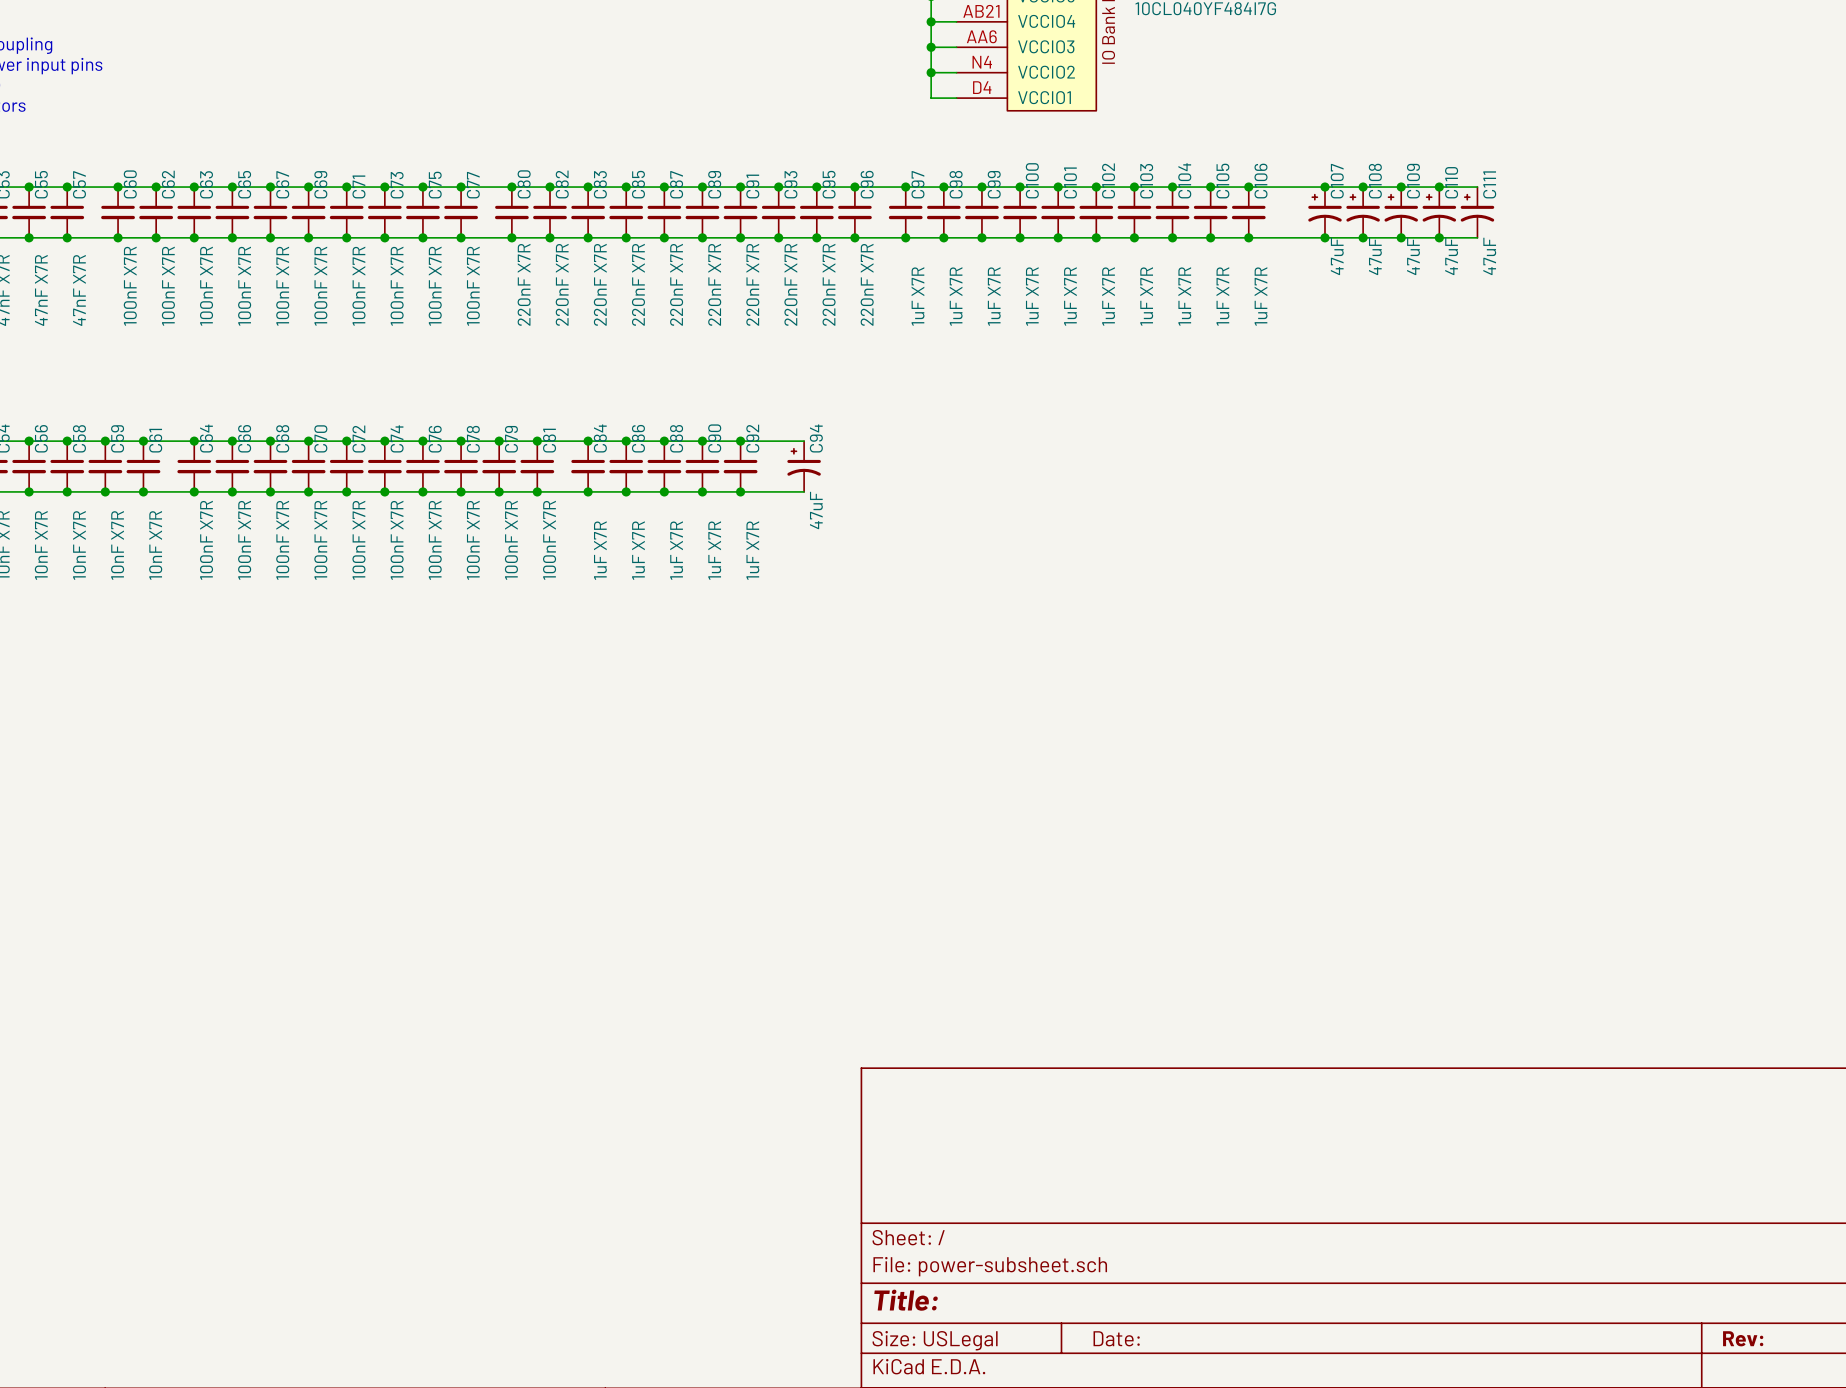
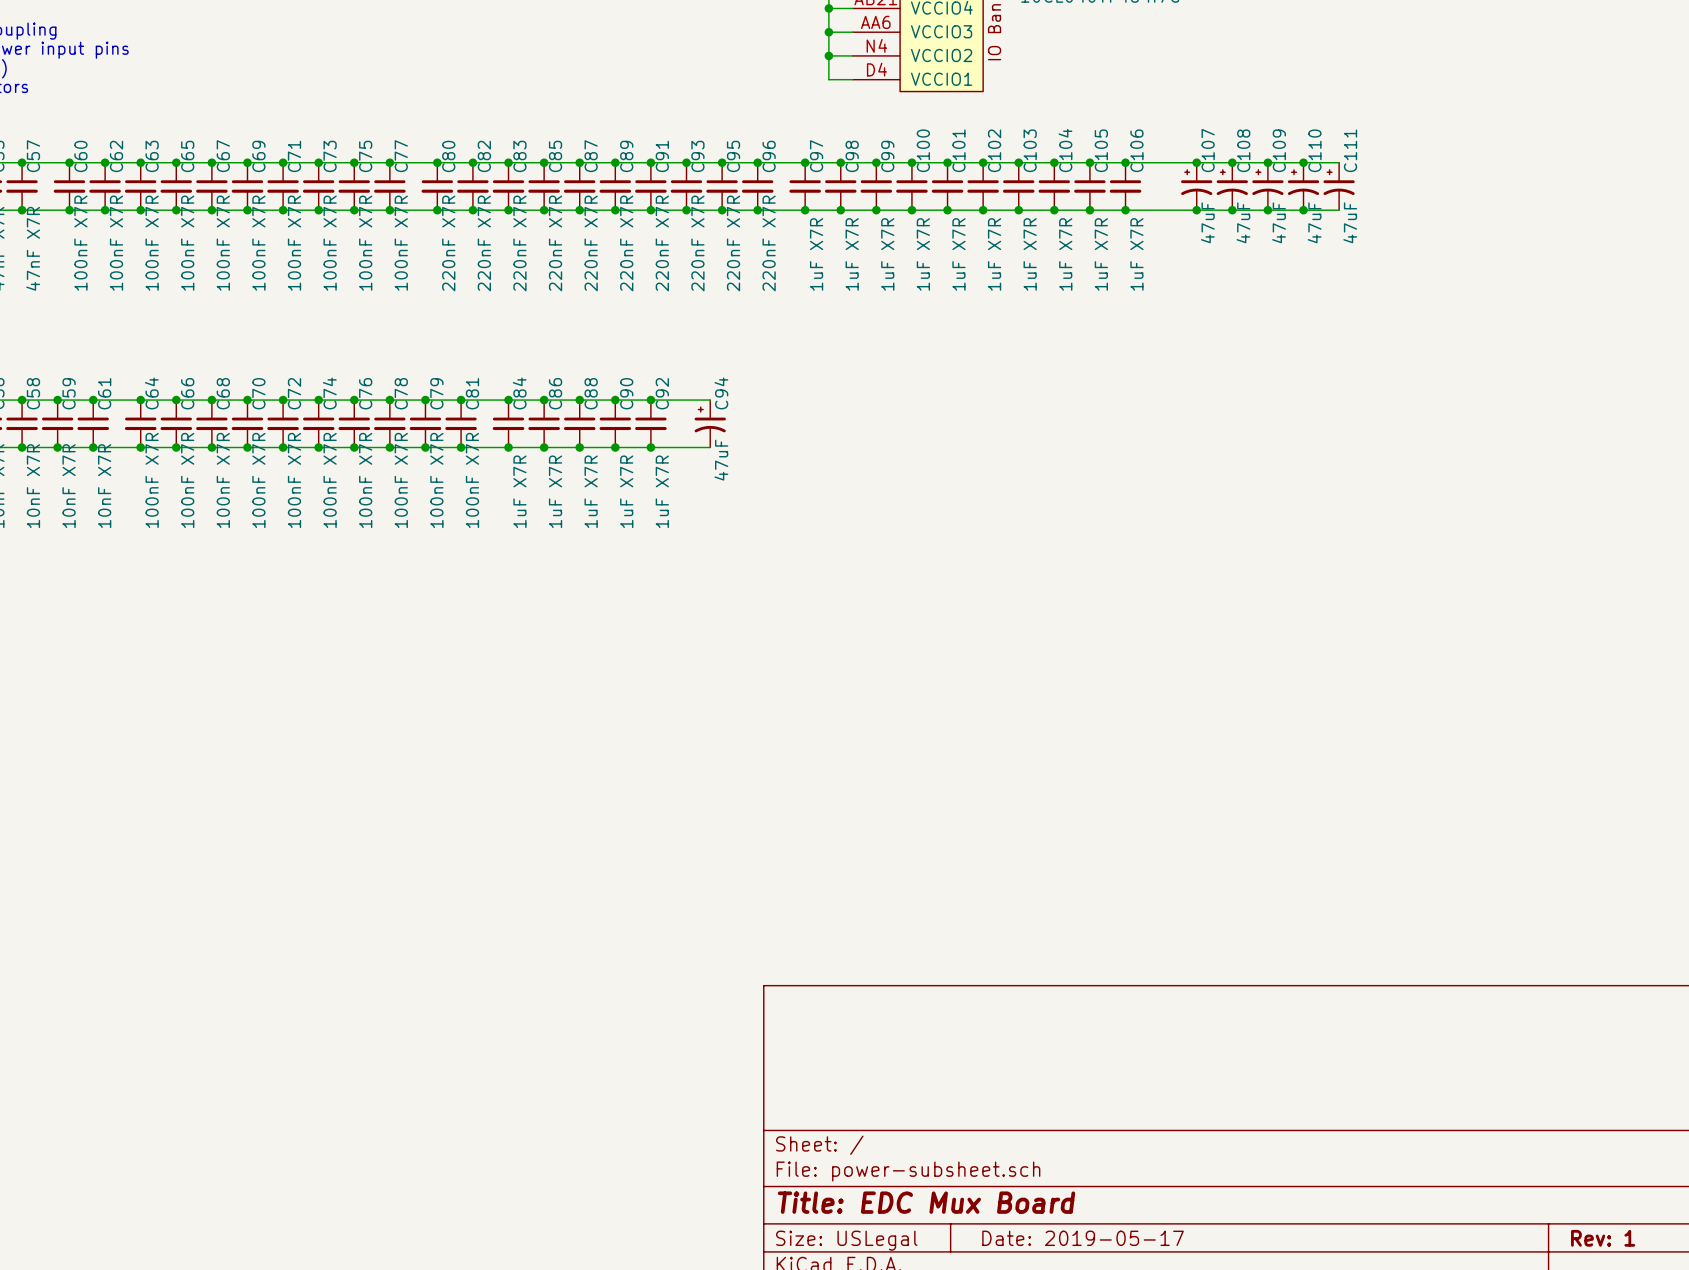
title block: Title: (906, 1300) -> Title: EDC Mux Board (926, 1202)
title block: Date: (1116, 1338) -> Date: 2019-05-17 (1083, 1238)
title block: Rev: (1743, 1338) -> Rev: 1 (1603, 1238)

